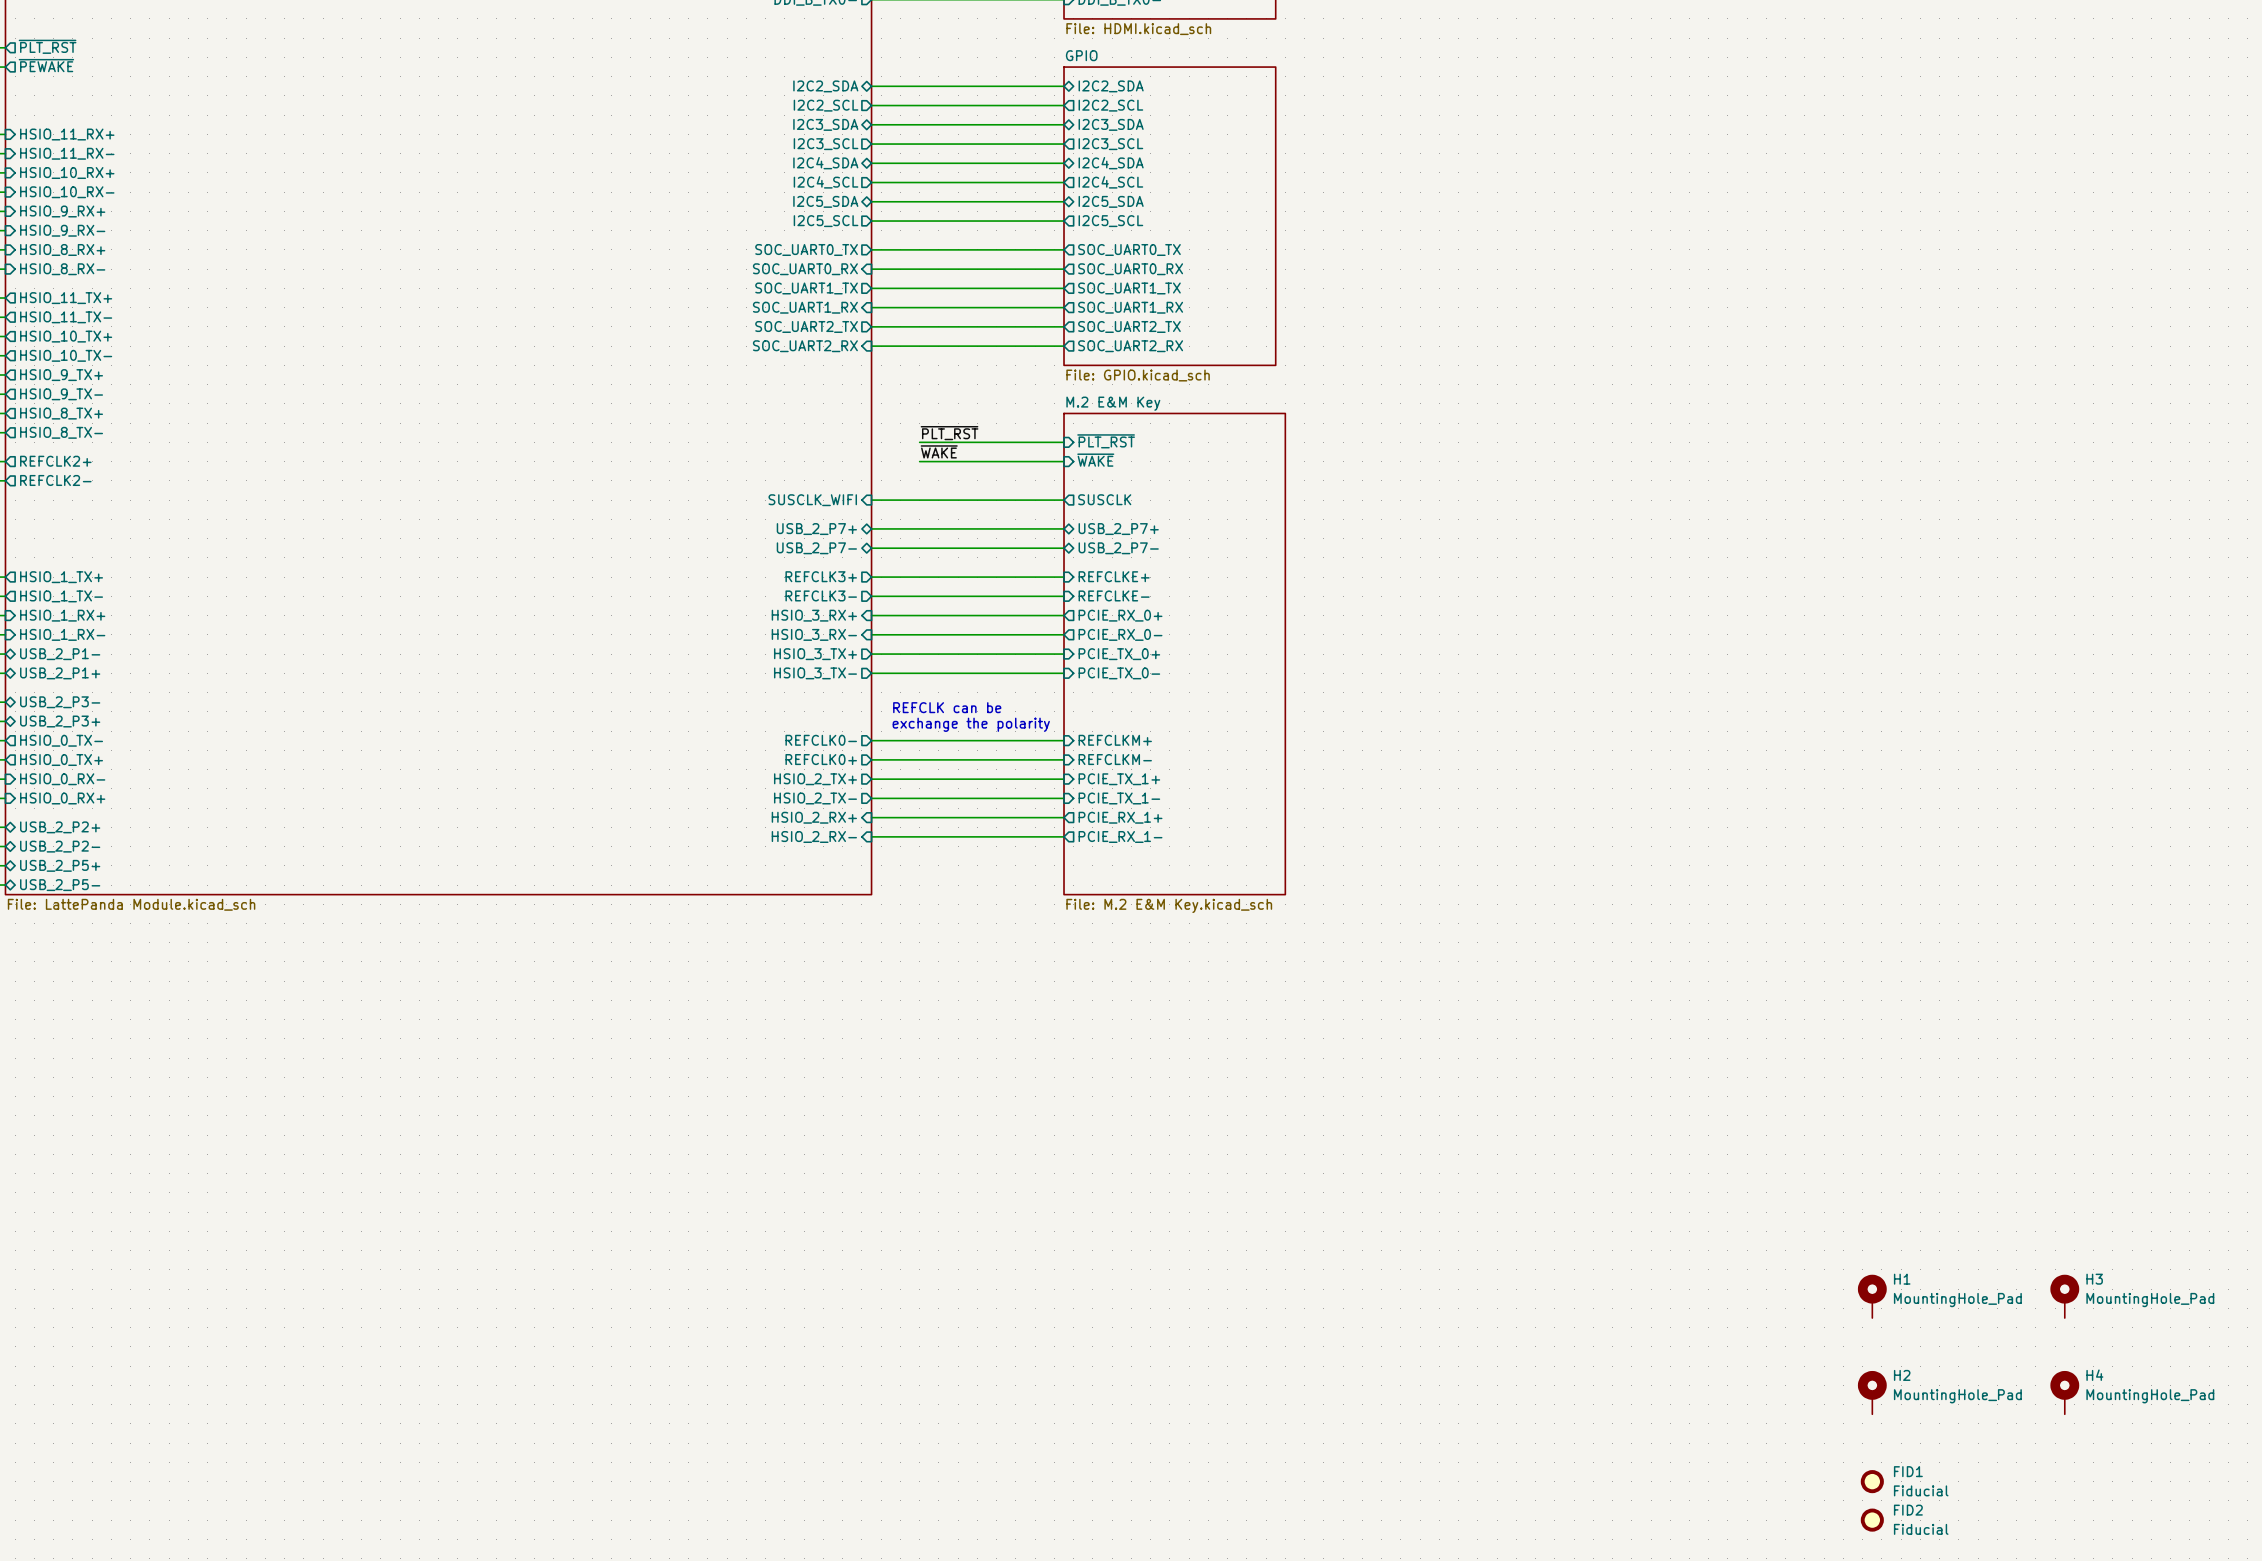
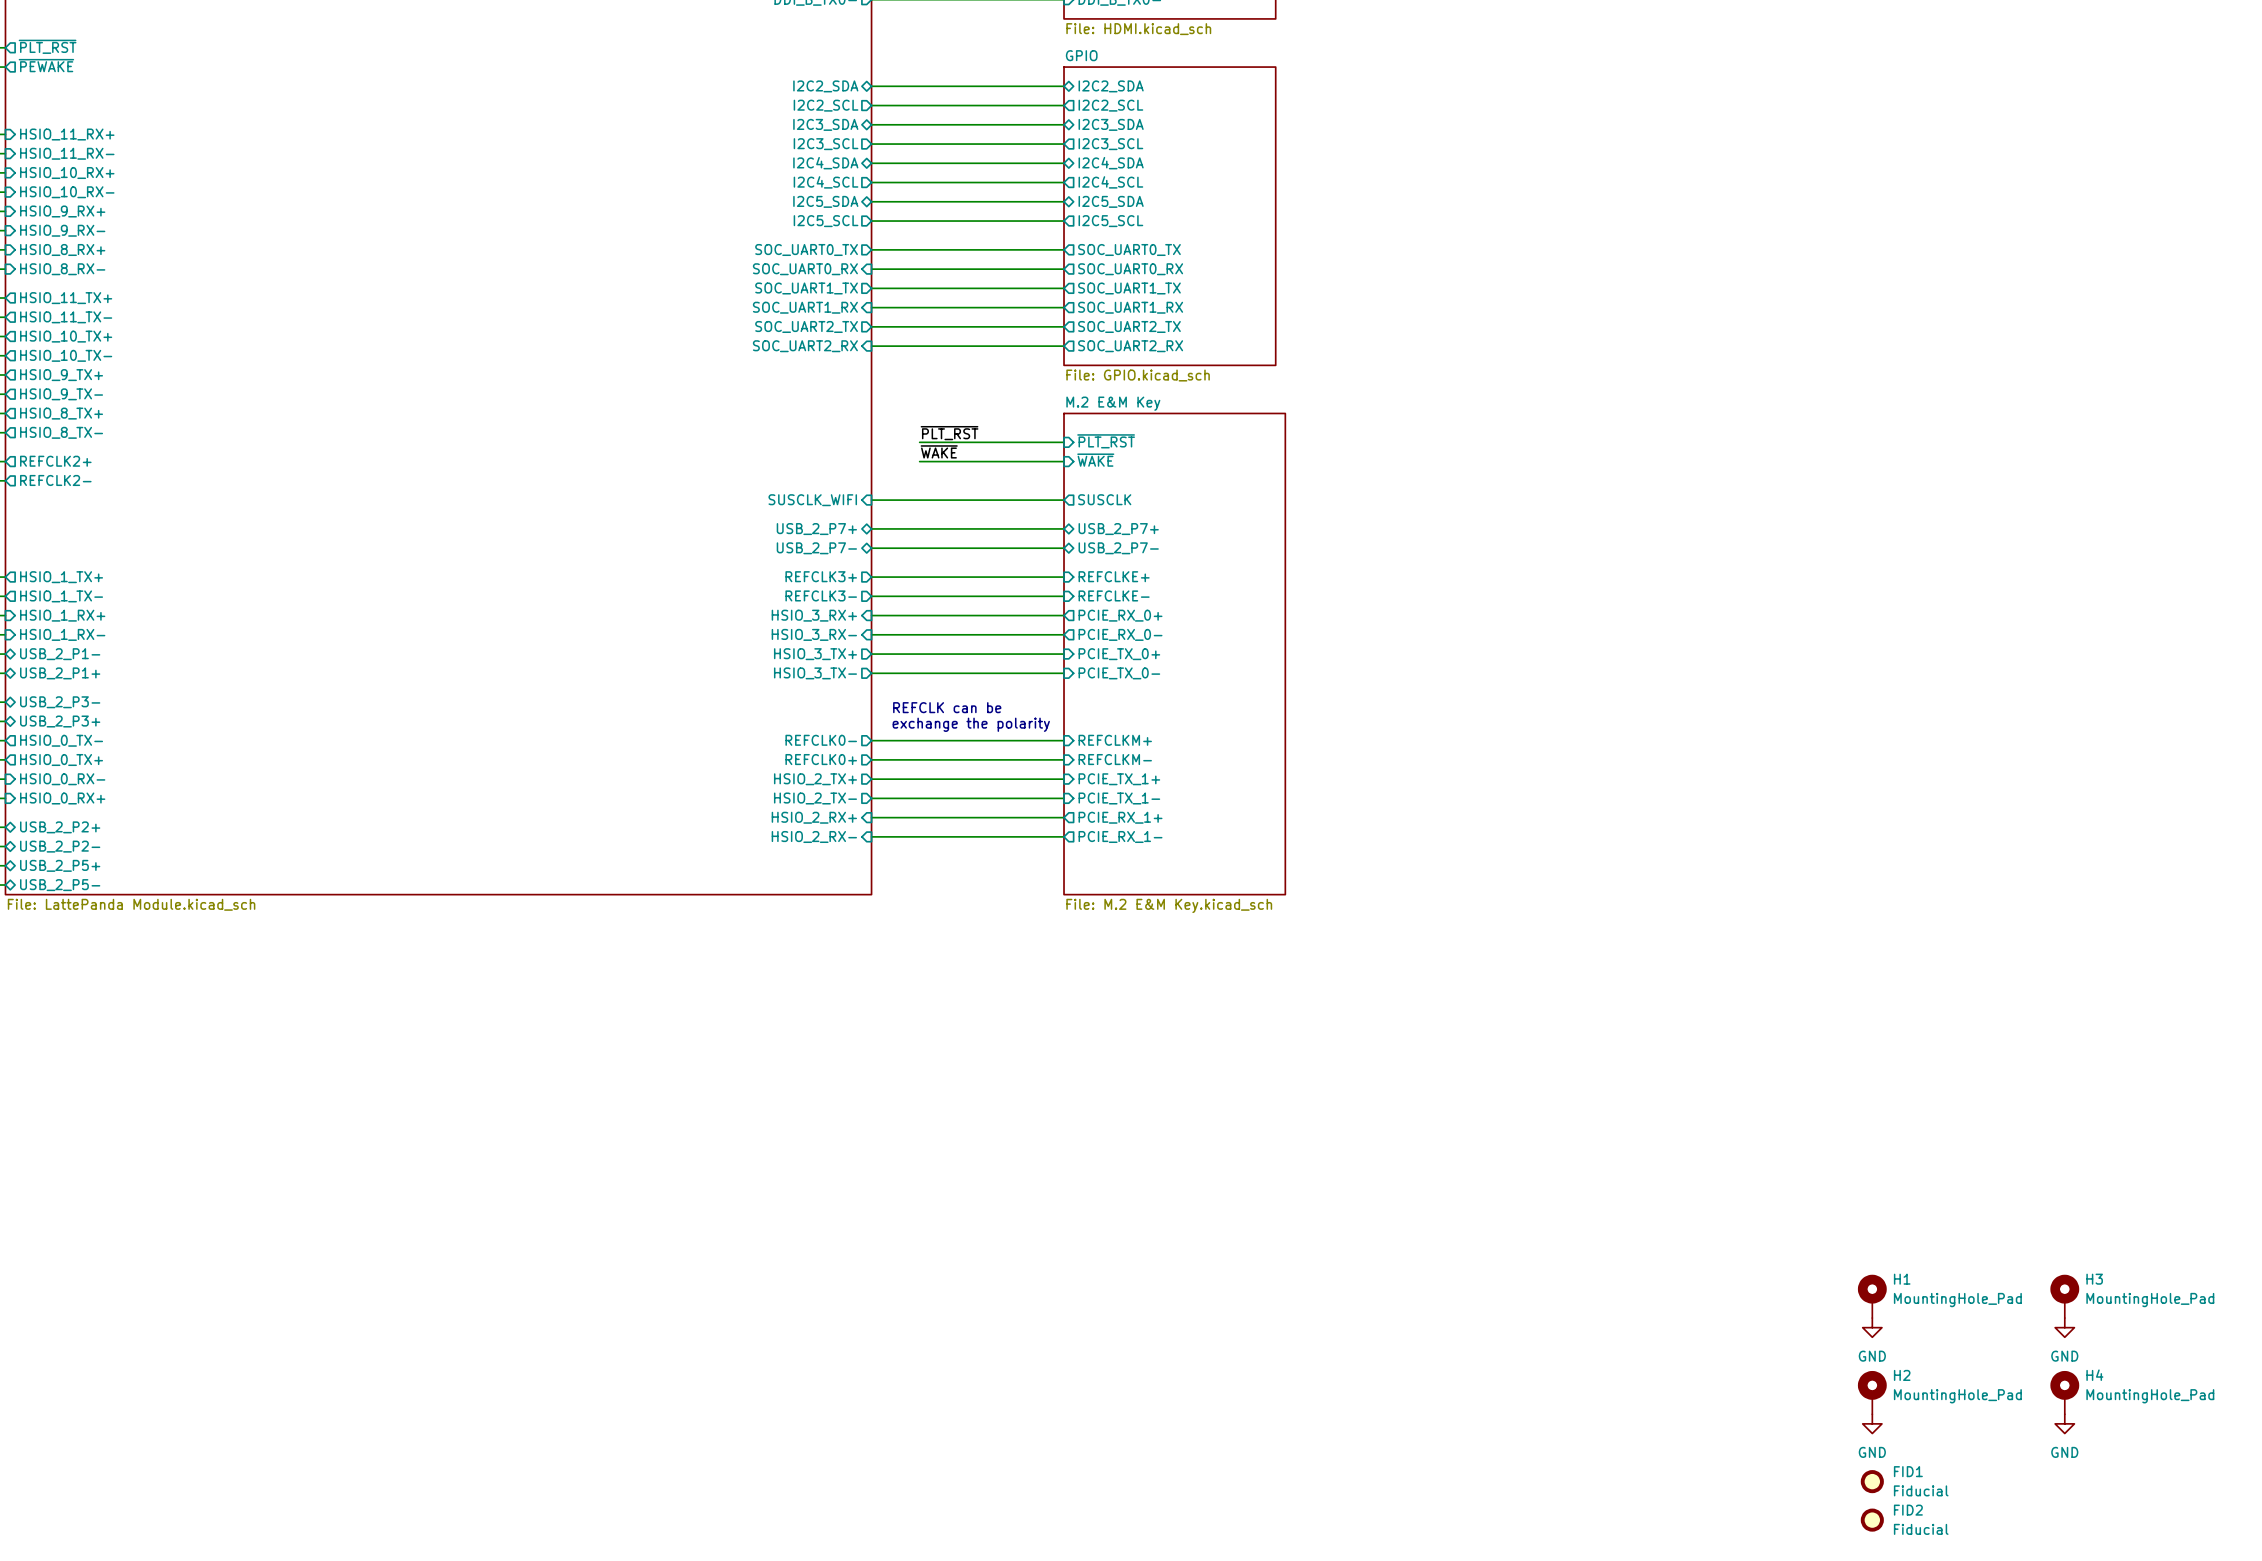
power symbol: none -> GND (1872, 1327)
power symbol: none -> GND (2064, 1327)
power symbol: none -> GND (1872, 1423)
power symbol: none -> GND (2064, 1423)

